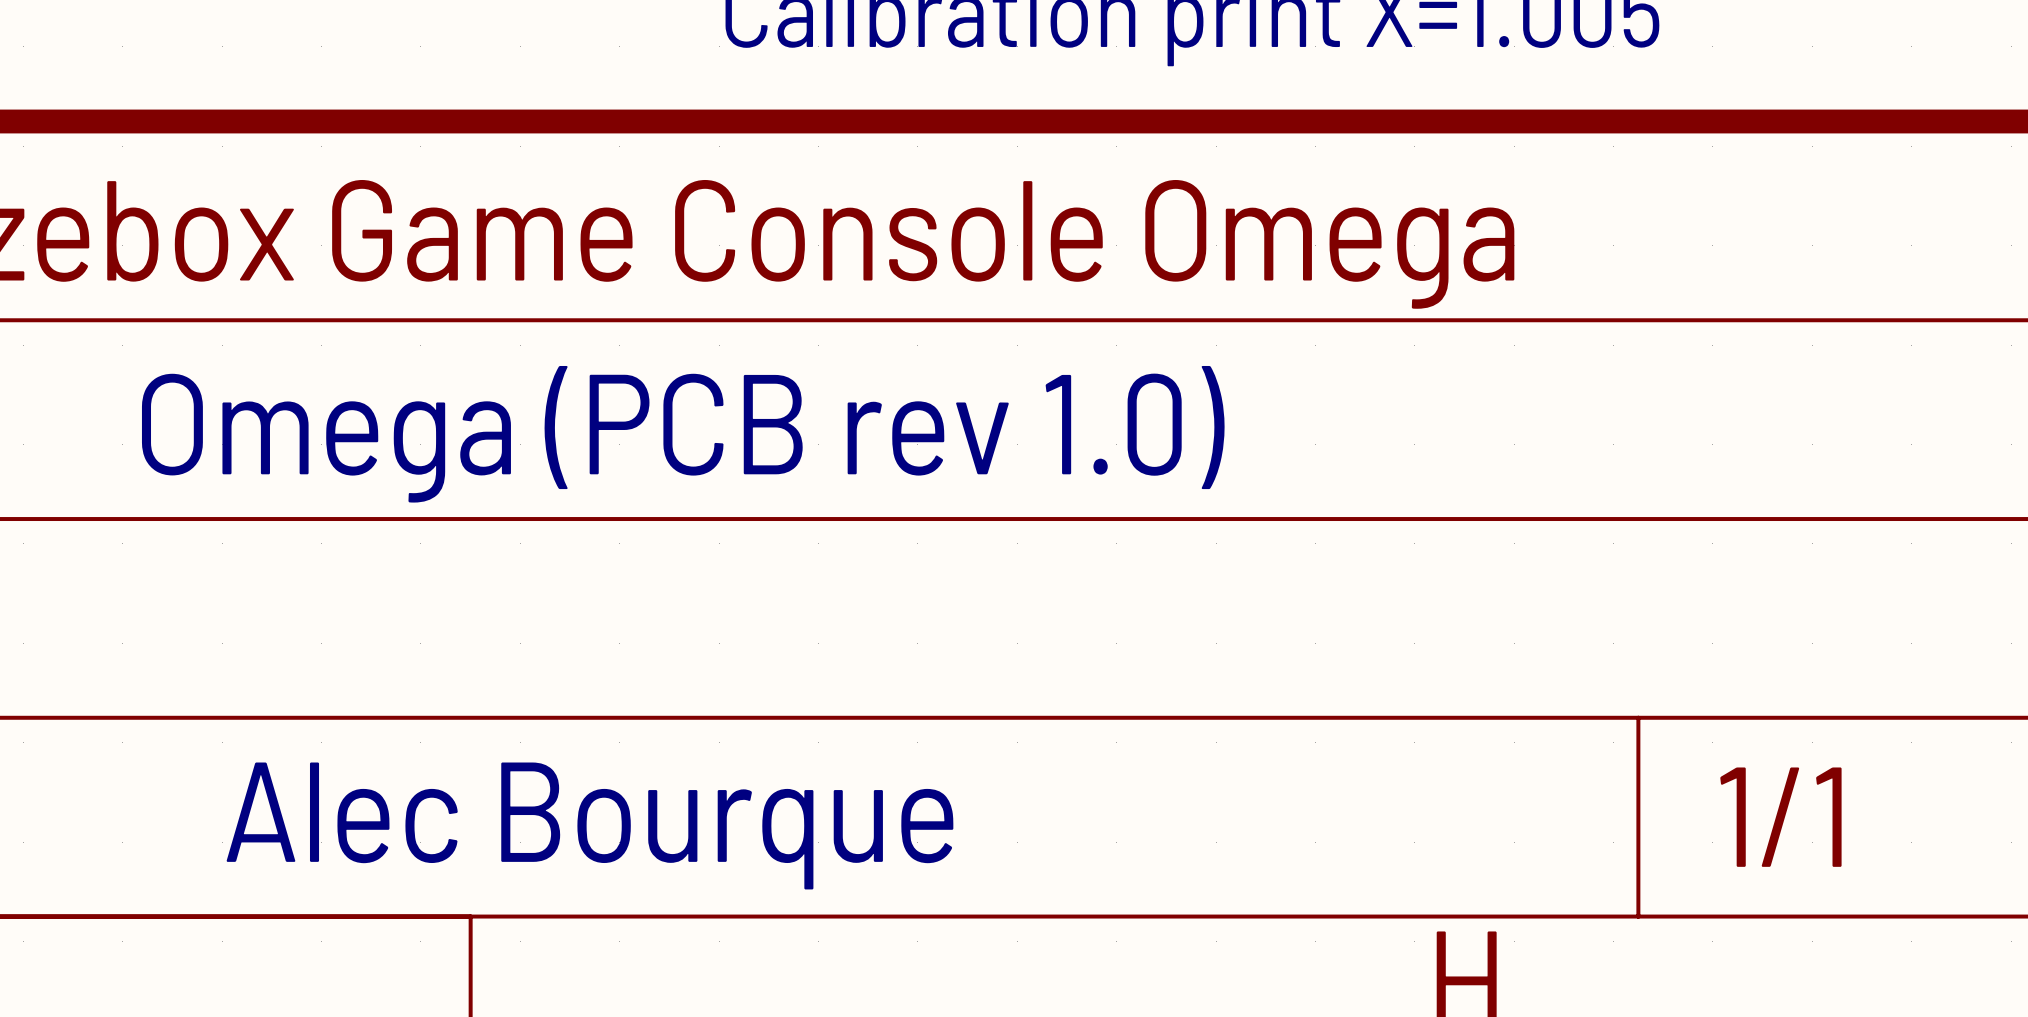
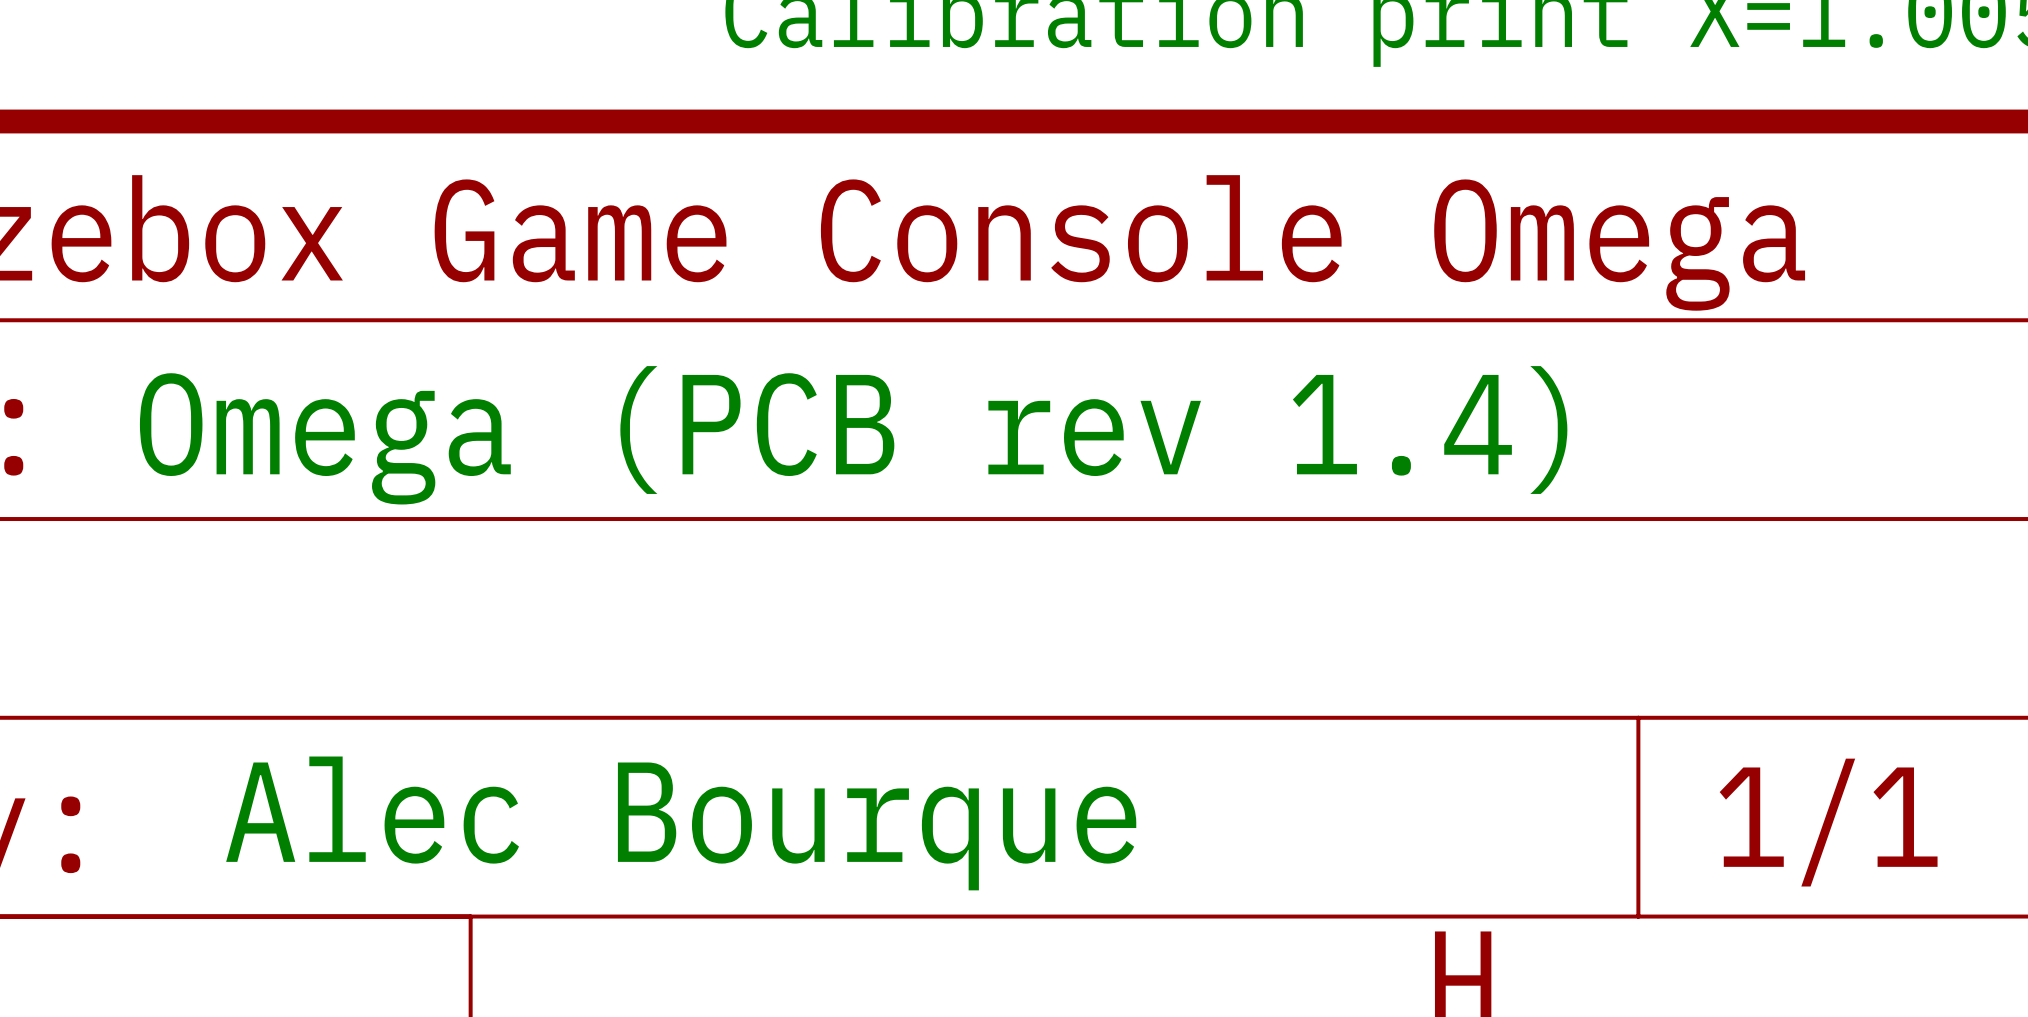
text: Omega (PCB rev 1.0) (683, 434) -> Omega (PCB rev 1.4) (853, 435)

